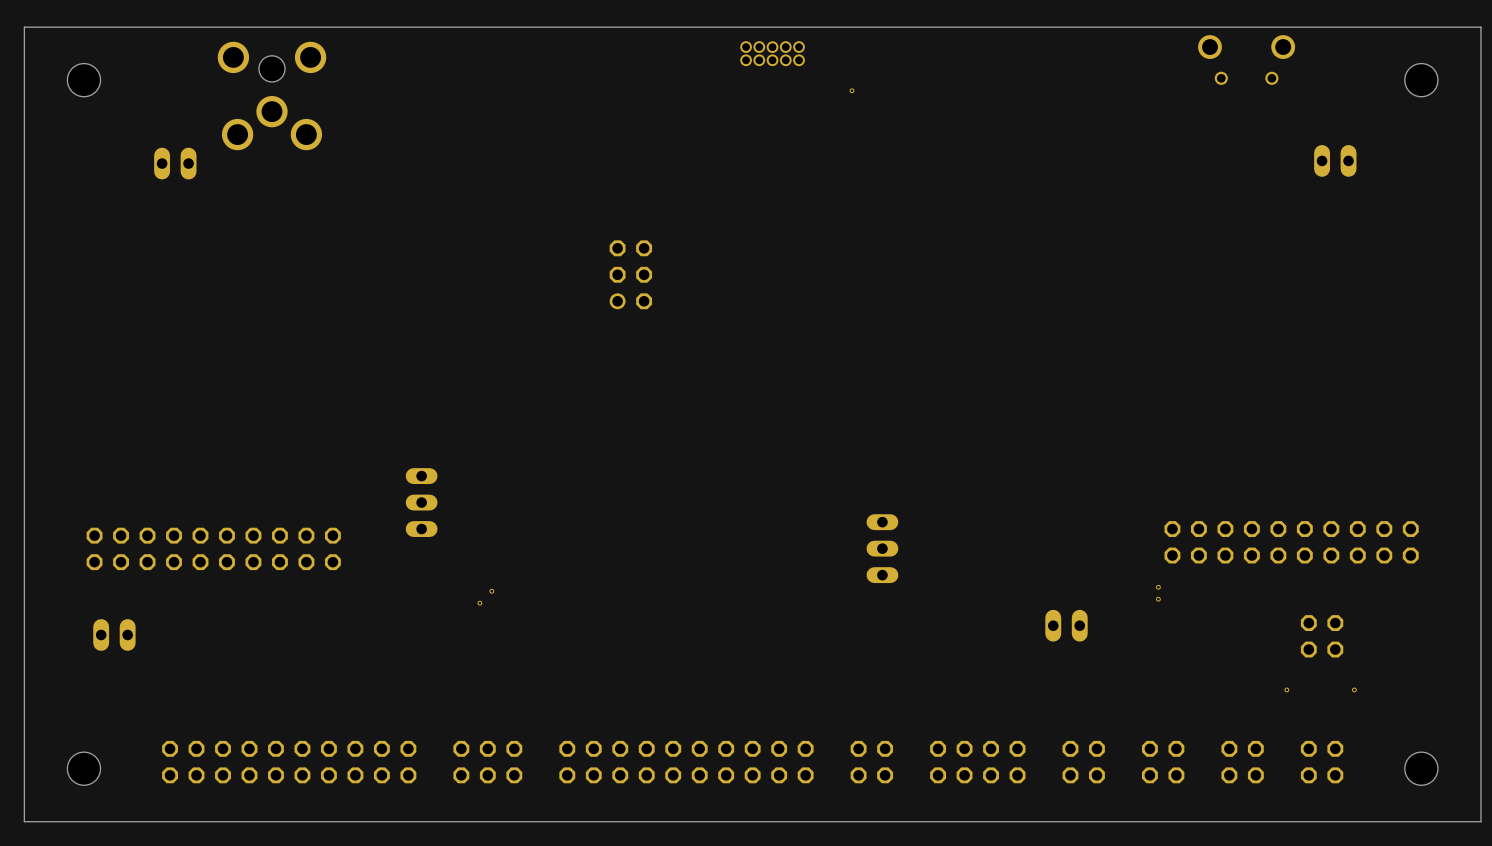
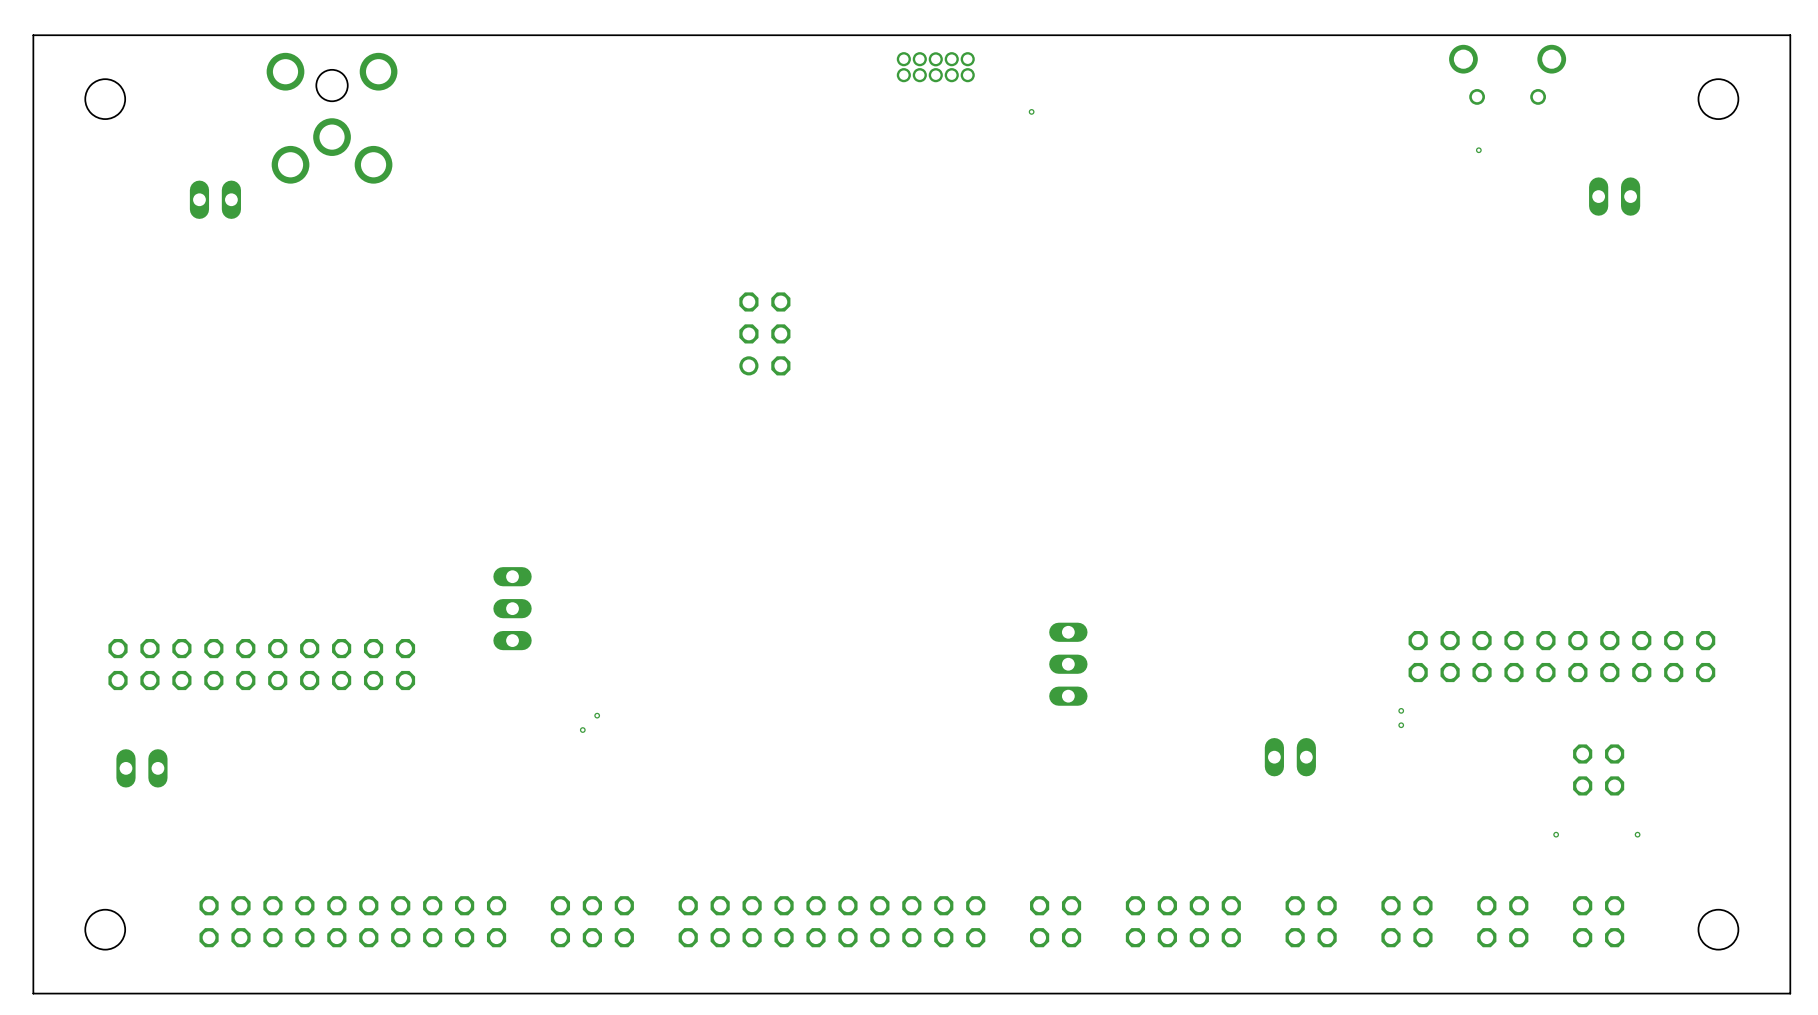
part: none -> (1478, 150)

